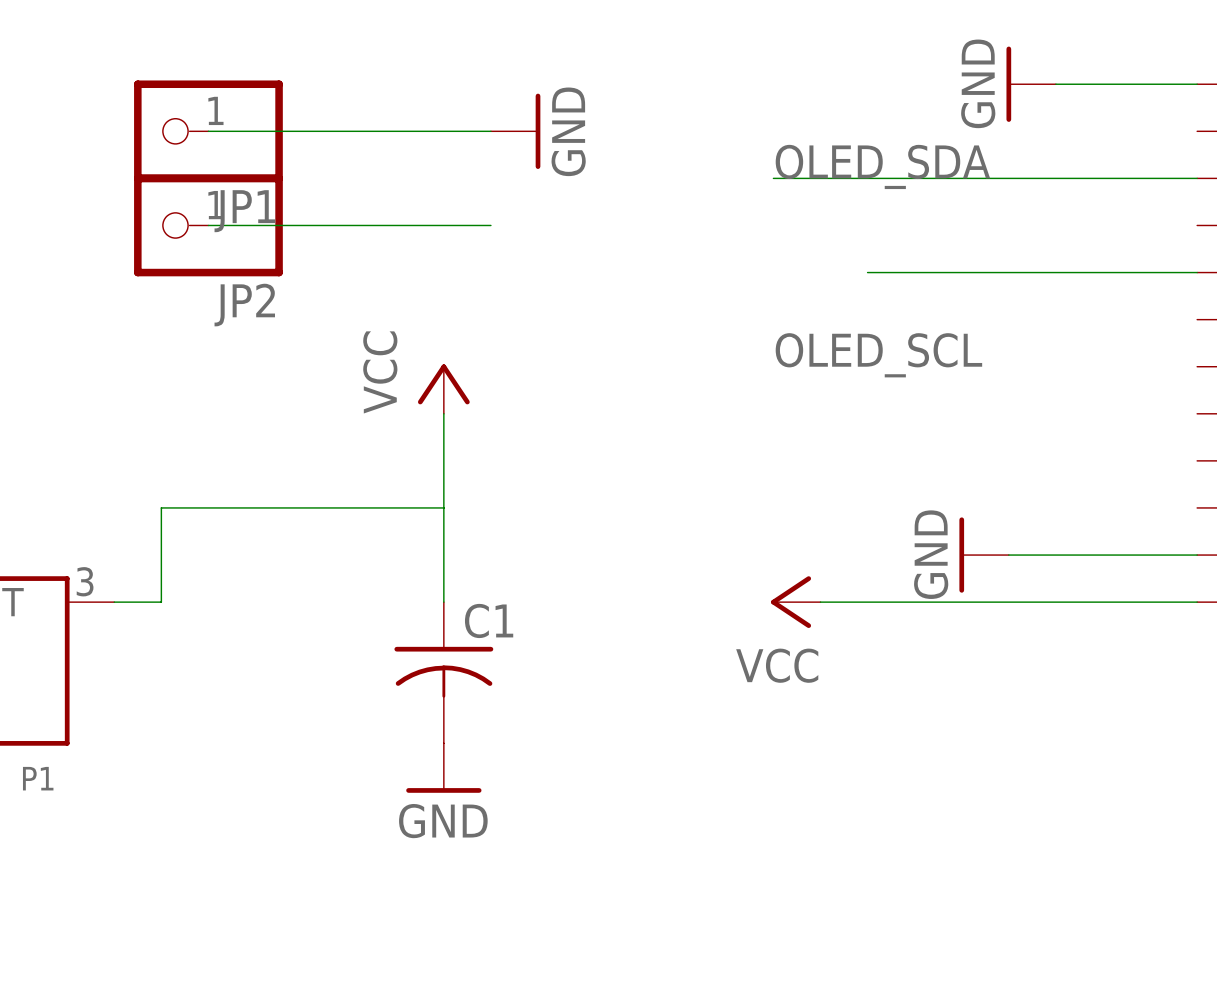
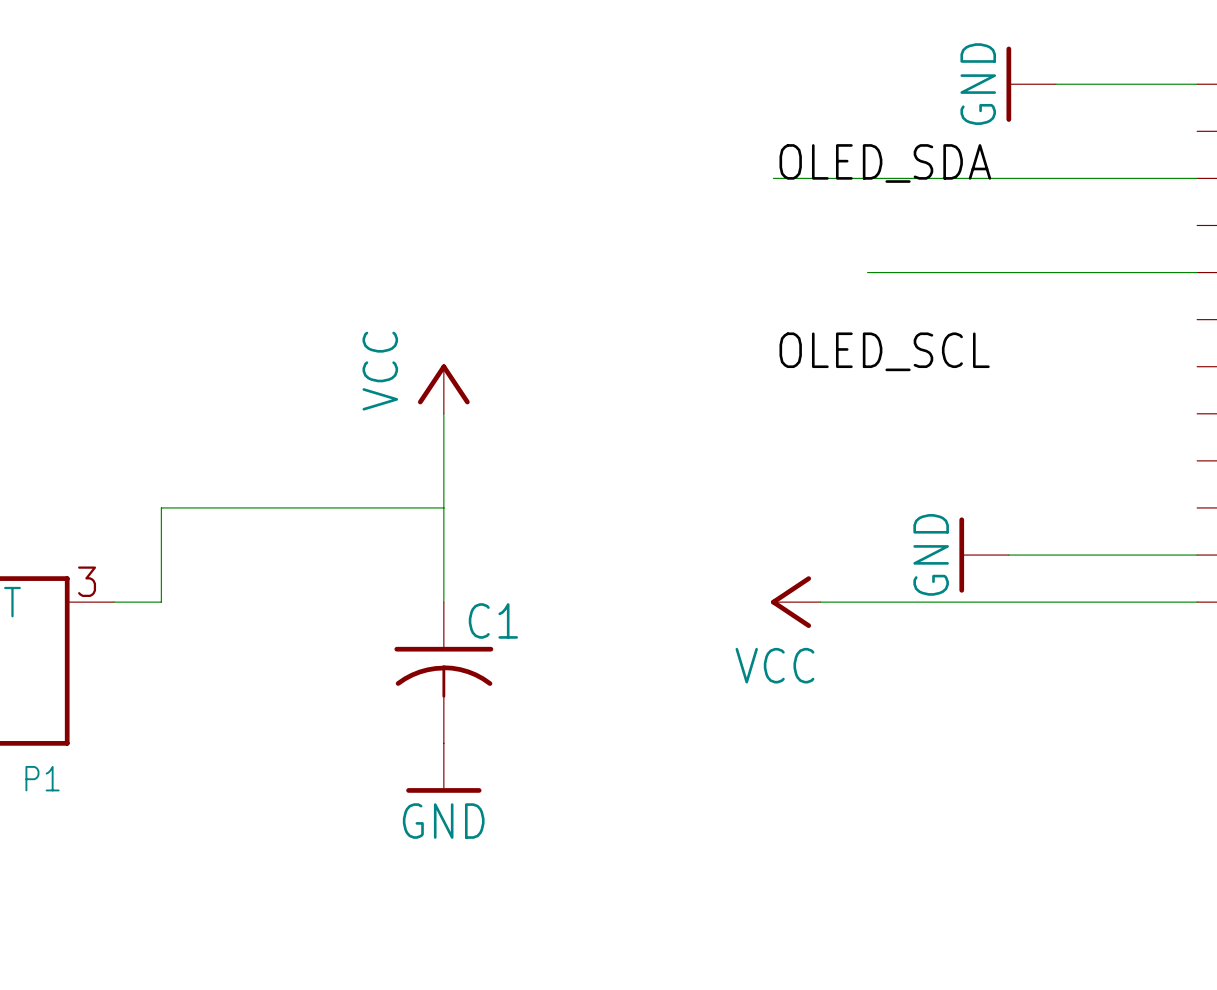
wire: (208, 131) (490, 131) -> none
JP1: (208, 131) -> none
power symbol: GND (515, 131) -> none
wire: (208, 225) (490, 225) -> none
JP2: (208, 225) -> none

